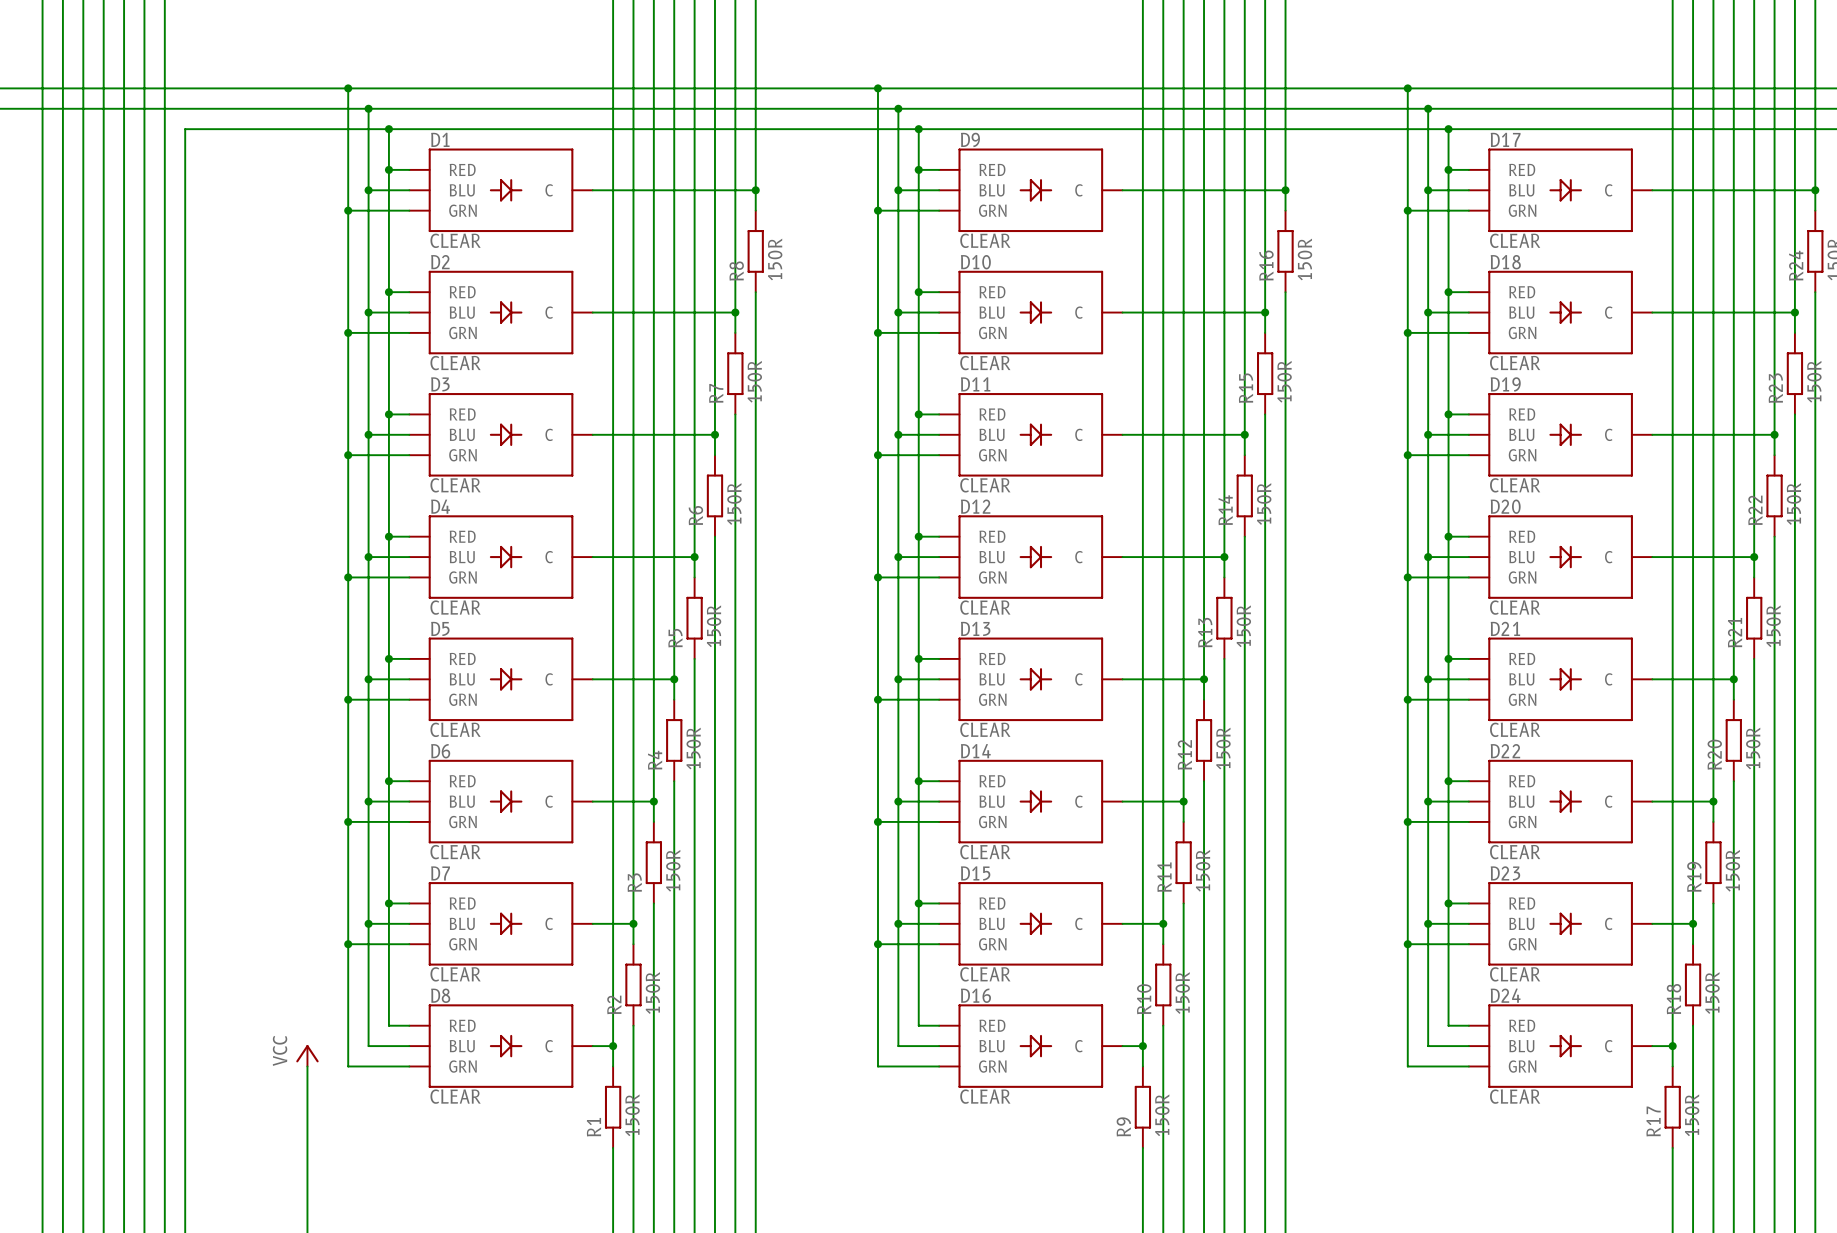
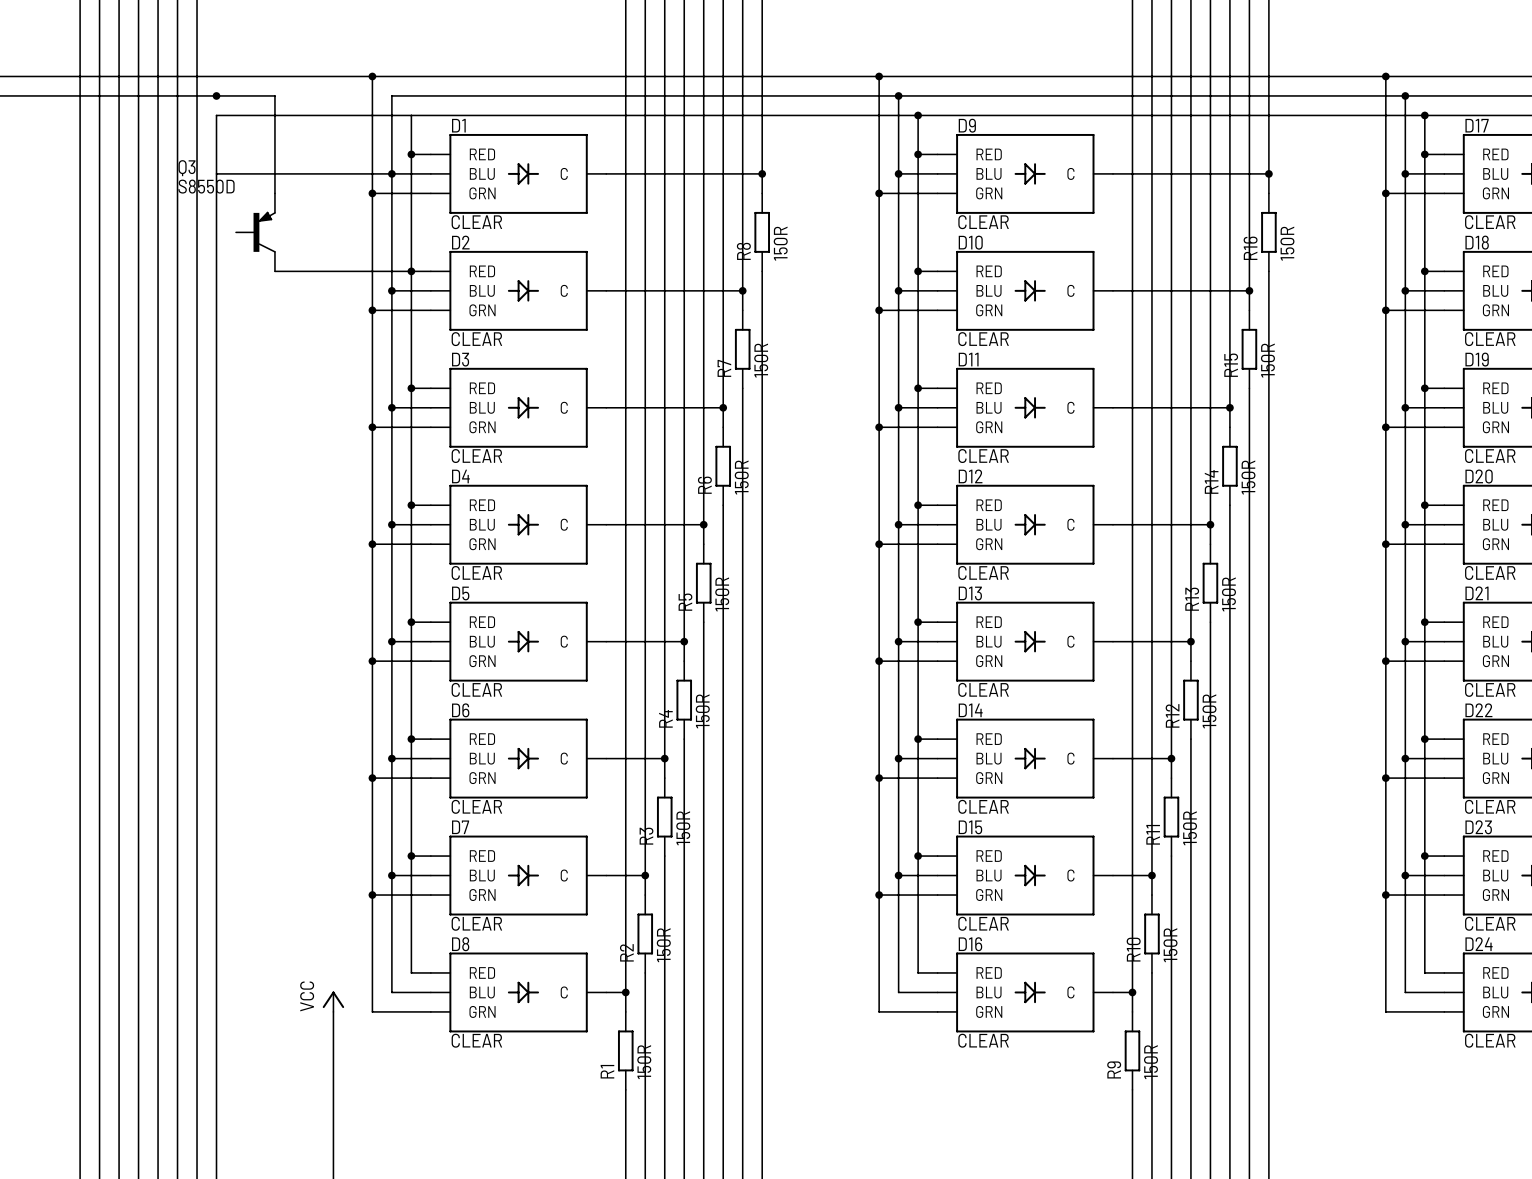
junction: none -> (216, 95)
wire: (246, 108) (368, 108) -> (274, 95) (274, 193)
junction: (368, 108) -> none
junction: (388, 129) -> none
wire: none -> (216, 173) (391, 173)
Q3: none -> S8550D (255, 232)
wire: none -> (274, 271) (411, 271)

